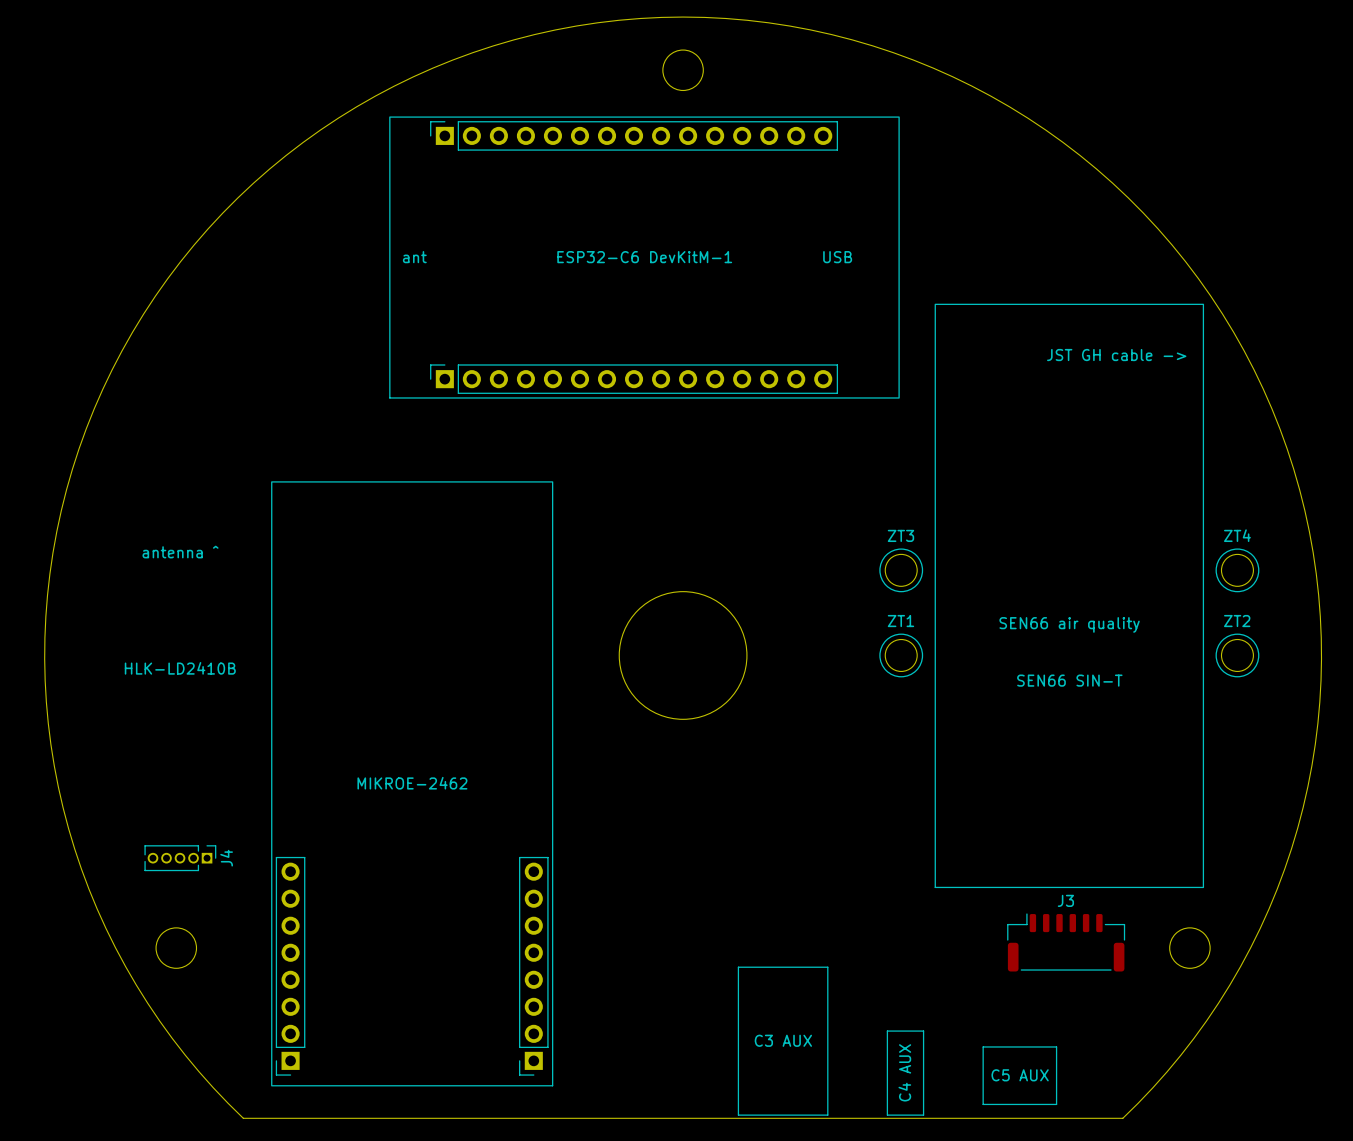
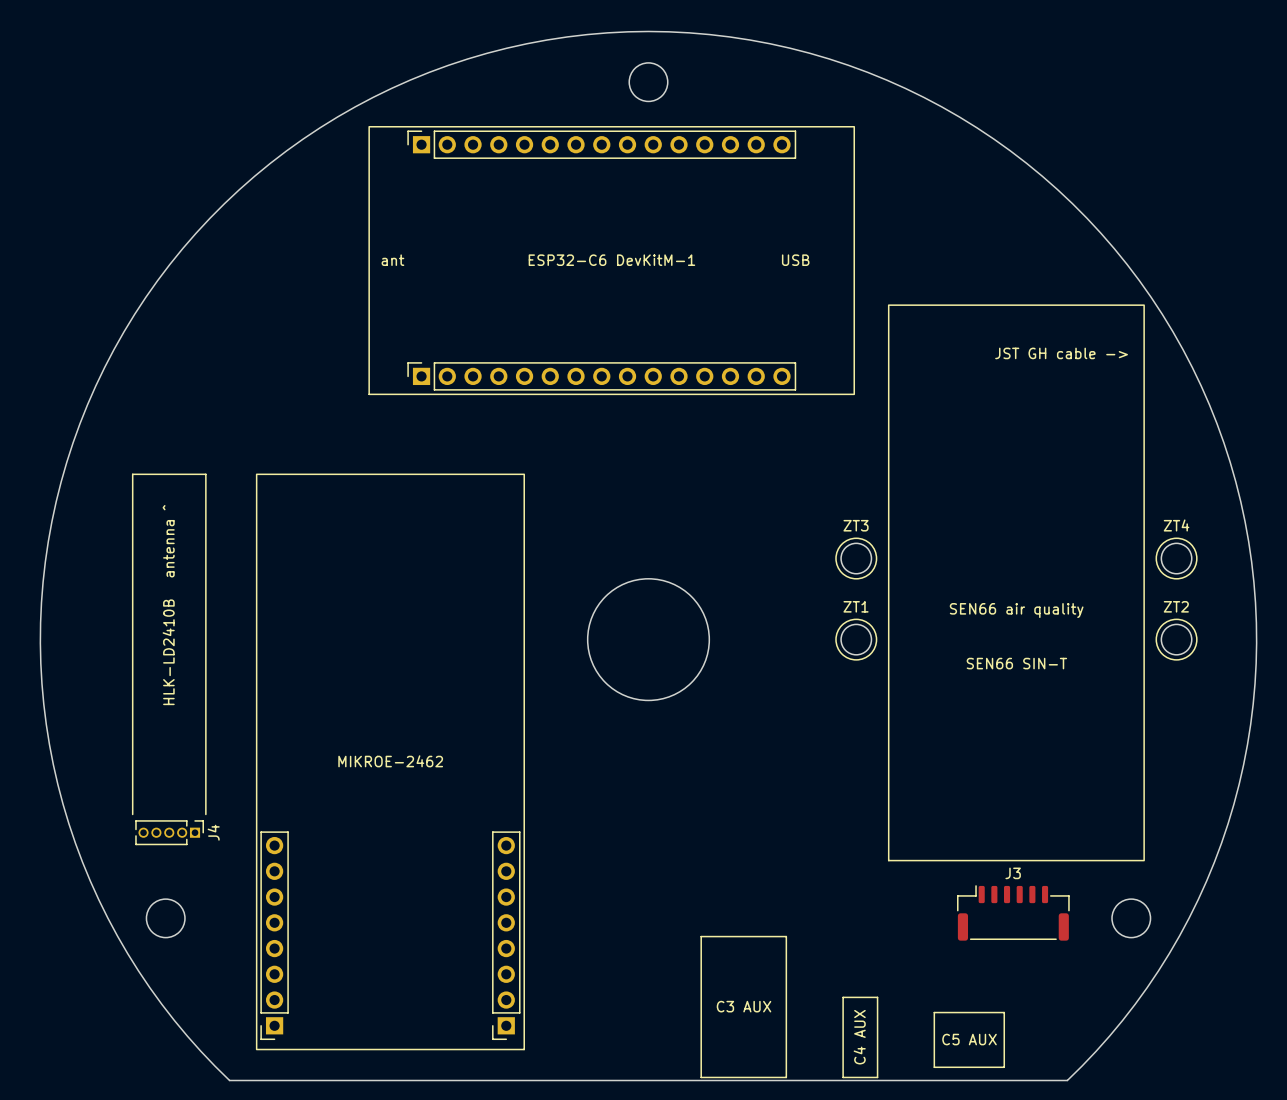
drawing: none -> [132, 473, 207, 816]
text rotation: 0° (180, 552) -> 90° counterclockwise (168, 541)
text rotation: 0° (180, 668) -> 90° counterclockwise (168, 652)

